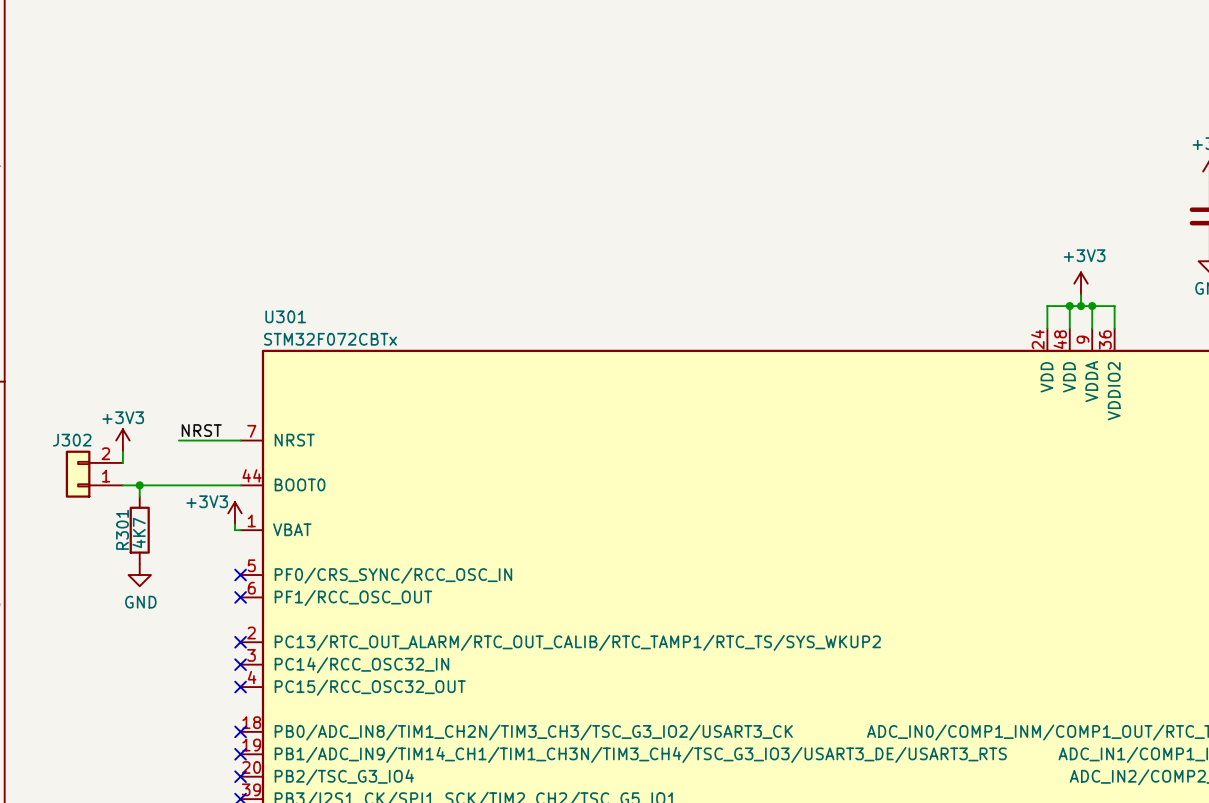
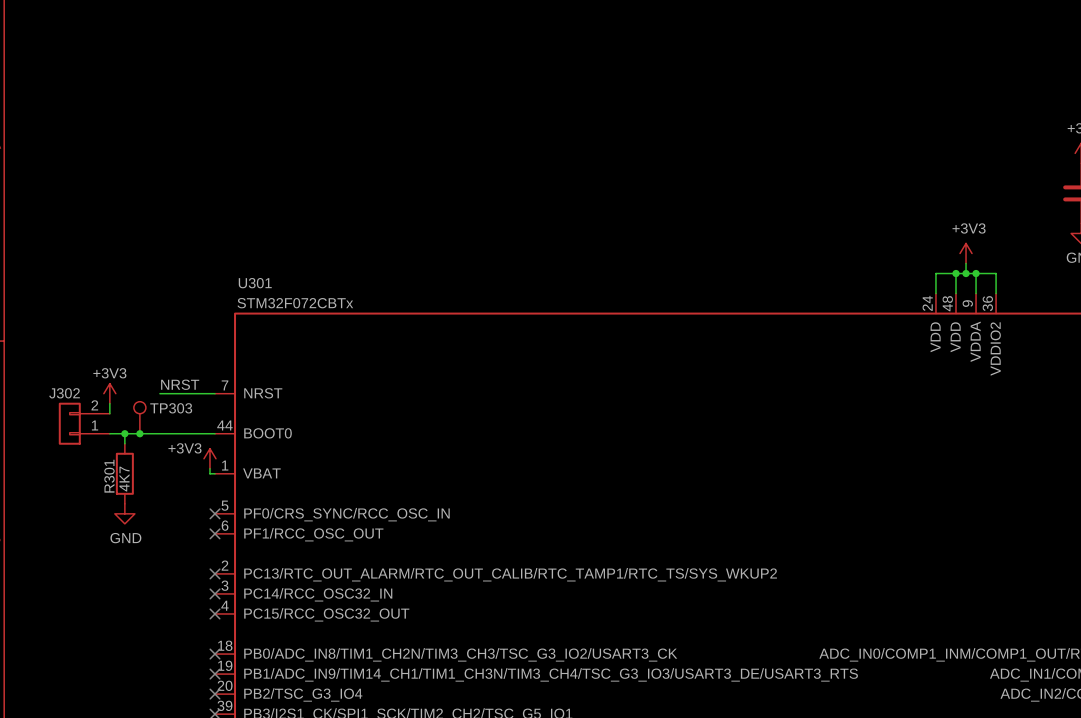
TP303: none -> (139, 417)
junction: none -> (139, 433)

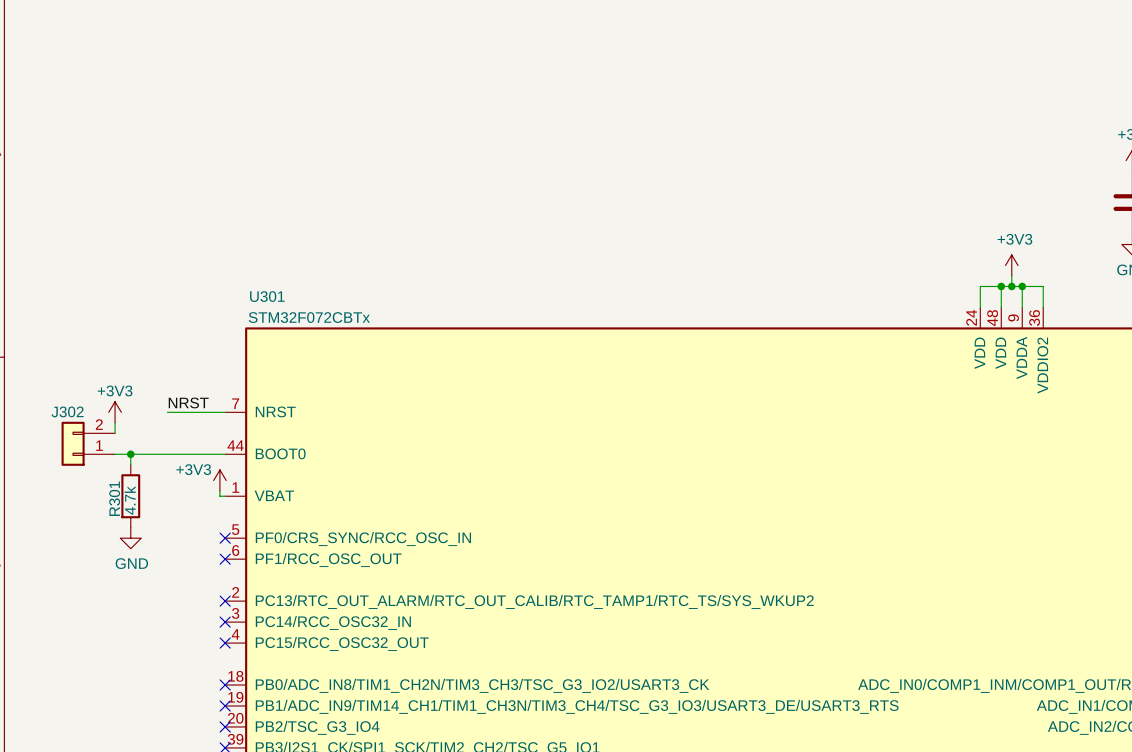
TP303: (139, 417) -> none
junction: (139, 433) -> none
R301 value: 4K7 (124, 479) -> 4.7k (130, 500)

